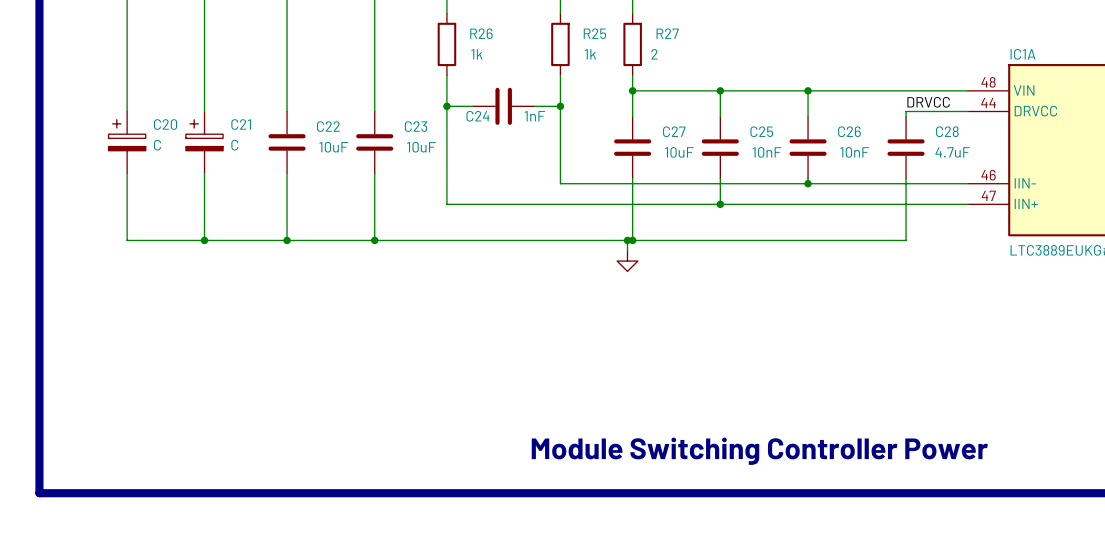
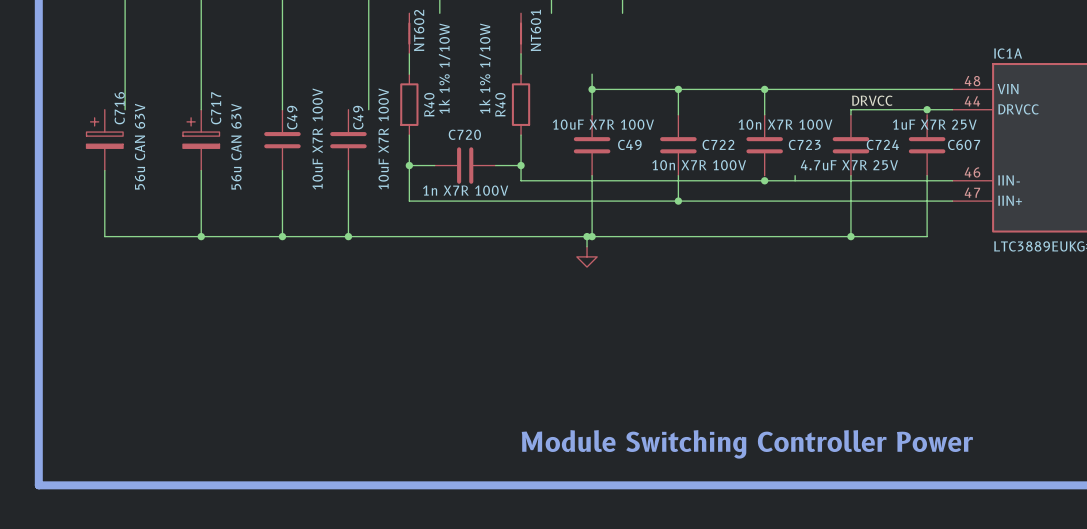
NT602: none -> (409, 33)
NT601: none -> (521, 33)
R26: 1k (446, 44) -> none
R25: 1k (560, 44) -> none
R27: 2 (632, 44) -> none
wire: none -> (409, 53) (409, 74)
wire: none -> (521, 53) (521, 74)
wire: (446, 75) (446, 204) -> (409, 135) (409, 201) (439, 201)
wire: (560, 75) (560, 183) -> (521, 135) (521, 180) (551, 180)
wire: (632, 75) (632, 116) -> (592, 74) (592, 114)
wire: none -> (592, 89) (622, 89)
junction: none -> (592, 89)
junction: (632, 90) -> none
junction: none -> (678, 89)
wire: (720, 90) (720, 116) -> (678, 89) (678, 114)
junction: (720, 90) -> none
junction: none -> (764, 89)
wire: (808, 90) (808, 116) -> (764, 89) (764, 114)
junction: (808, 90) -> none
label position: DRVCC (928, 102) -> DRVCC (872, 100)
R40: none -> 1k 1% 1/10W (409, 104)
wire: (446, 106) (472, 106) -> (409, 165) (434, 165)
junction: (446, 106) -> none
C24: 1nF (503, 106) -> none
R40: none -> 1k 1% 1/10W (521, 104)
wire: (534, 106) (560, 106) -> (495, 165) (521, 165)
junction: (560, 106) -> none
wire: (906, 111) (906, 116) -> (891, 109) (850, 109) (850, 114)
junction: none -> (927, 109)
C21 name: C21 (241, 124) -> C717 (216, 108)
C22 name: C22 (328, 126) -> C49 (292, 117)
C716: none -> 56u CAN 63V (104, 140)
C20: C (127, 142) -> none
C49: none -> 10uF X7R 100V (348, 140)
C23: 10uF (374, 142) -> none
C21 value: C (234, 145) -> 56u CAN 63V (236, 146)
C22 value: 10uF (333, 147) -> 10uF X7R 100V (317, 139)
C49: none -> 10uF X7R 100V (592, 145)
C27: 10uF (632, 147) -> none
C722: none -> 10n X7R 100V (678, 145)
C25: 10nF (720, 147) -> none
C723: none -> 10n X7R 100V (764, 145)
C26: 10nF (808, 147) -> none
C724: none -> 4.7uF X7R 25V (850, 145)
C28: 4.7uF (906, 147) -> none
C607: none -> 1uF X7R 25V (927, 145)
junction: none -> (409, 165)
C720: none -> 1n X7R 100V (465, 165)
junction: none -> (521, 165)
wire: (127, 173) (127, 240) -> (104, 170) (104, 236) (125, 236)
wire: (374, 173) (374, 240) -> (348, 170) (348, 236)
wire: (632, 178) (632, 240) -> (592, 175) (592, 236)
wire: (720, 178) (720, 204) -> (678, 175) (678, 201)
wire: none -> (850, 175) (850, 236)
wire: (906, 178) (906, 240) -> (927, 175) (927, 236) (891, 236)
junction: none -> (764, 180)
junction: (808, 183) -> none
junction: none -> (678, 201)
junction: (720, 204) -> none
junction position: (374, 240) -> (348, 236)
junction: none -> (587, 236)
junction: none -> (592, 236)
wire: (627, 240) (627, 250) -> (587, 236) (587, 246)
junction: (627, 240) -> none
junction: (632, 240) -> none
junction: none -> (850, 236)
power symbol position: (627, 261) -> (587, 256)

